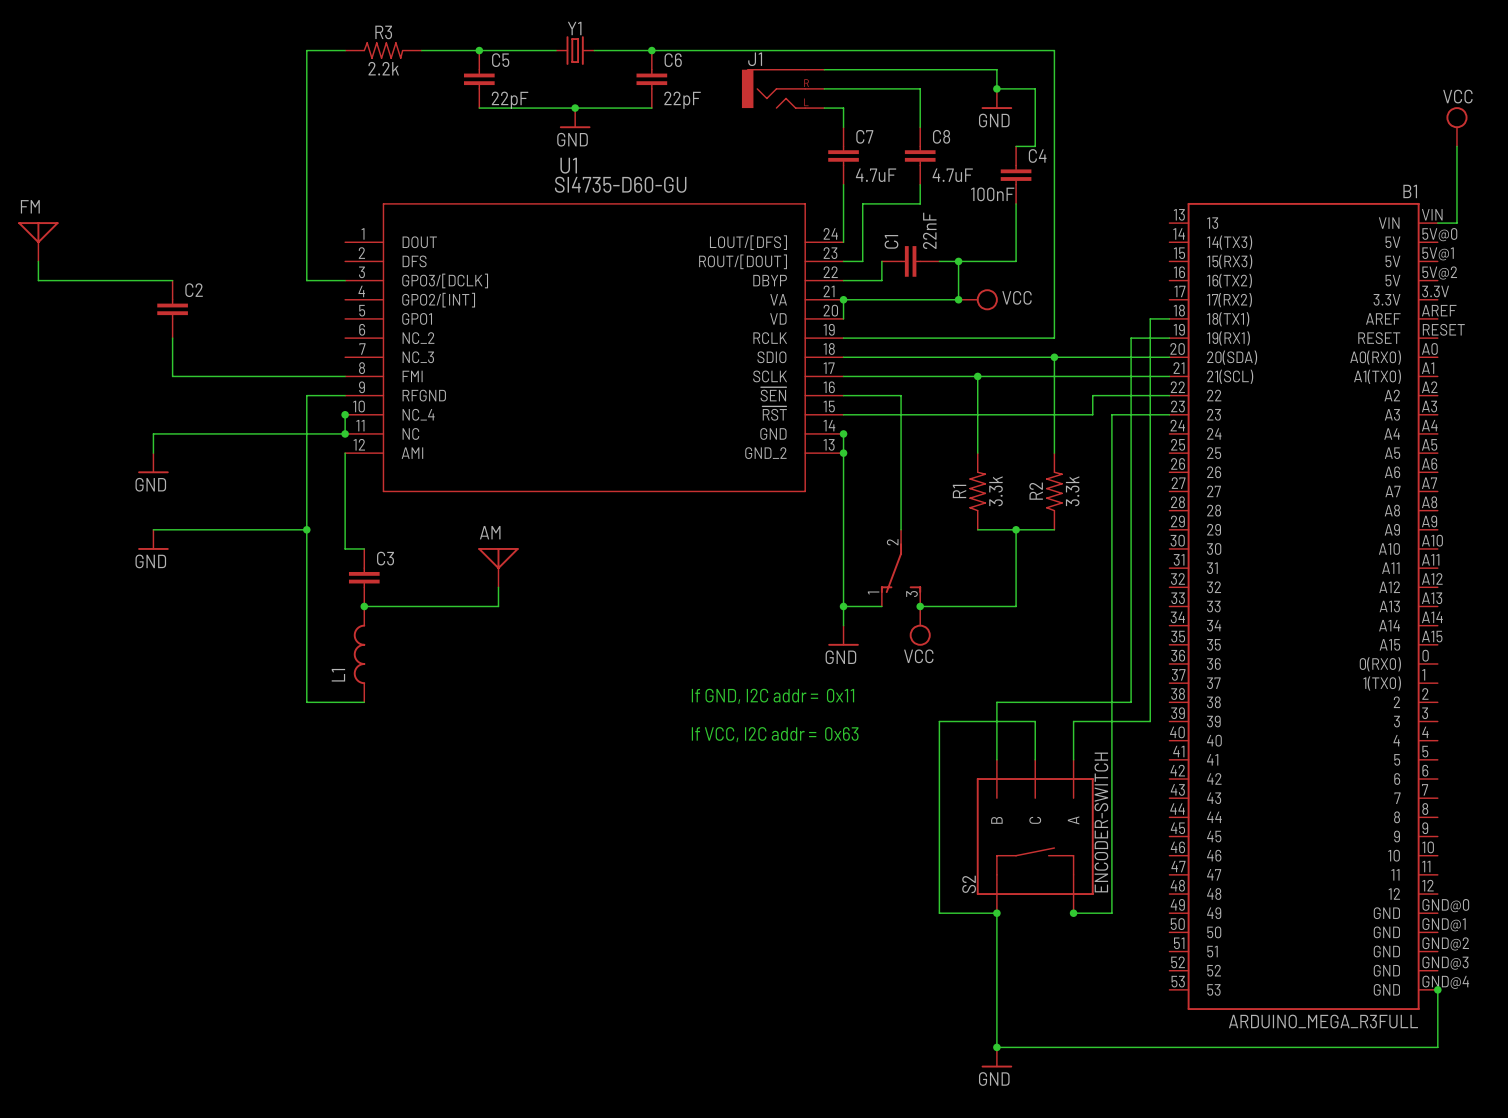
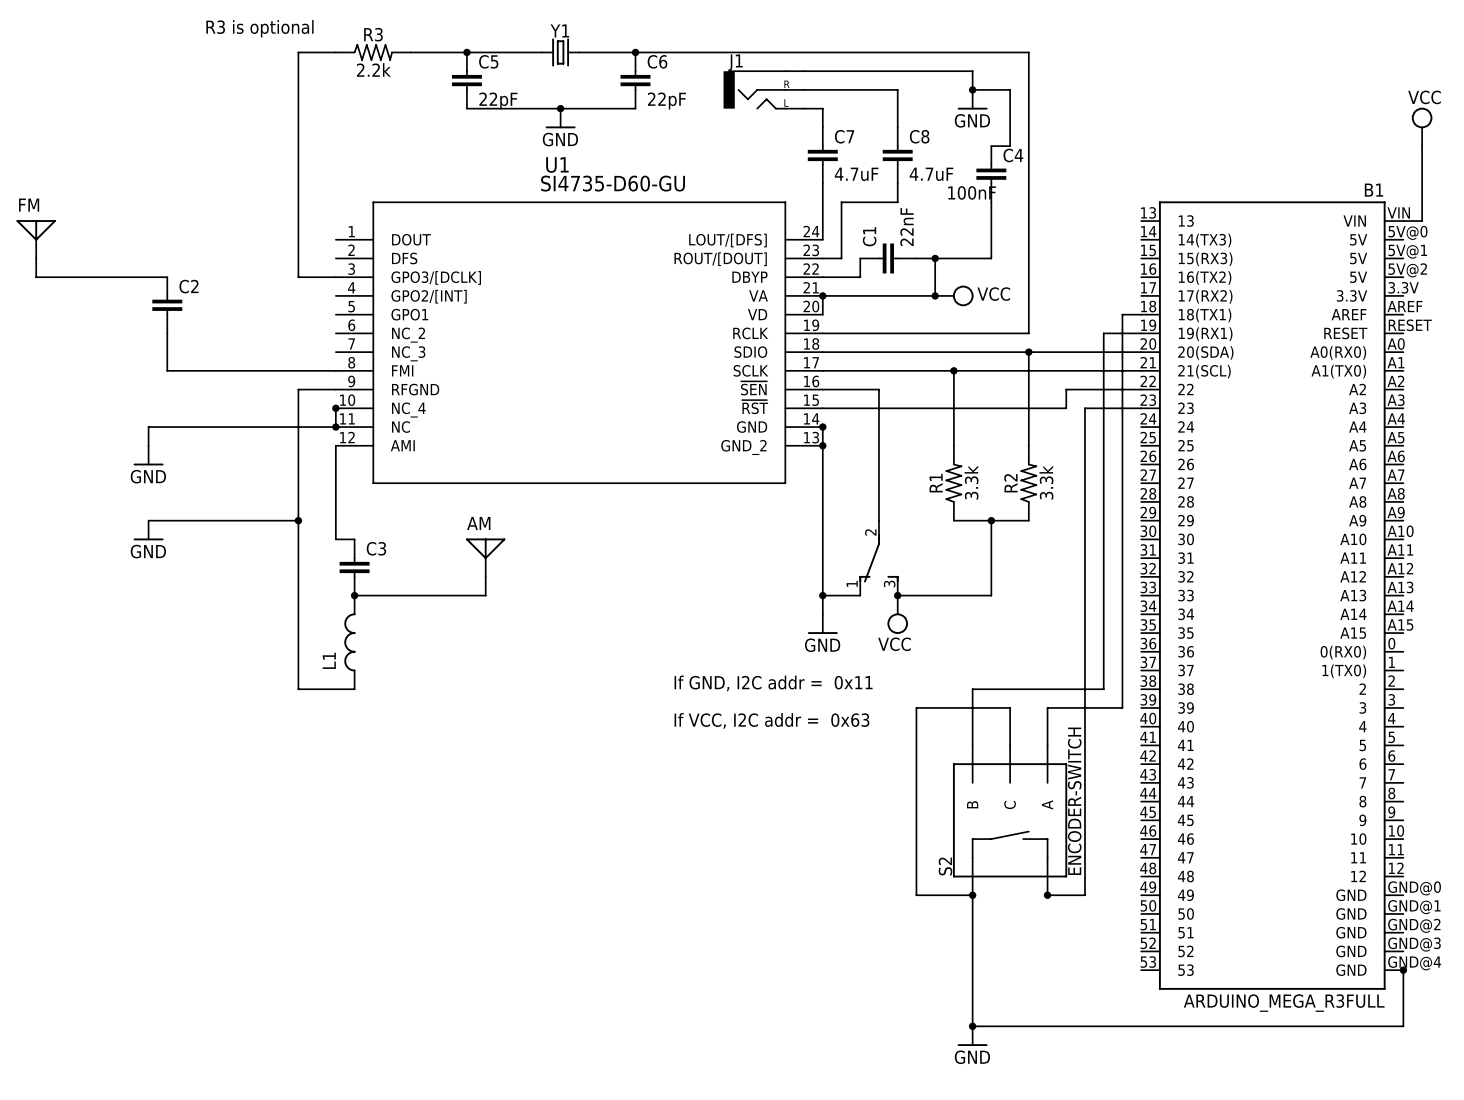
text: none -> R3 is optional (259, 28)

